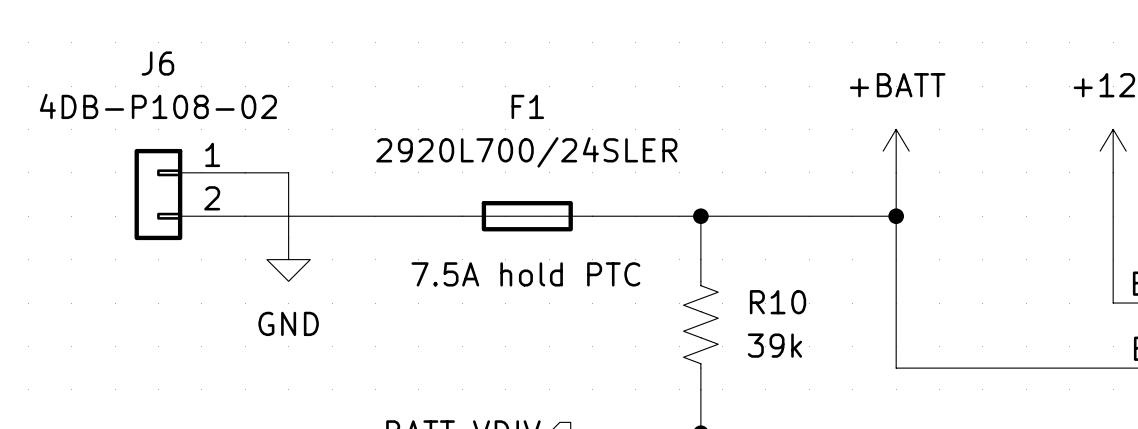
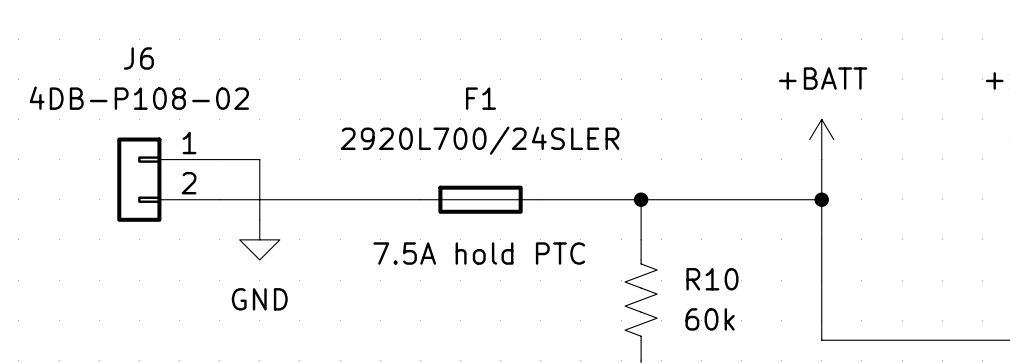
R10 value: 39k (774, 345) -> 60k (710, 319)

